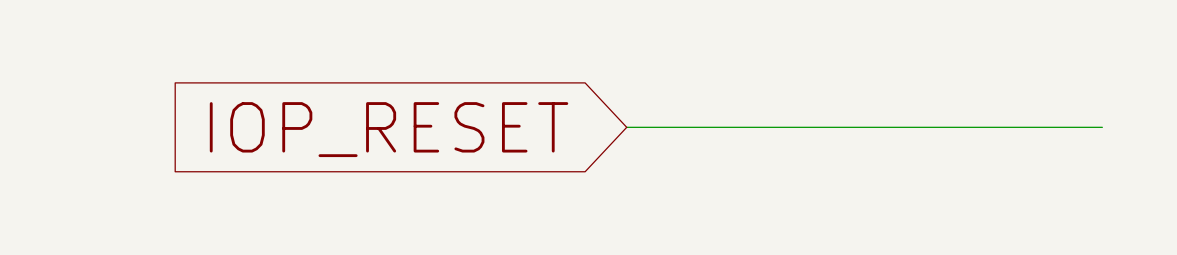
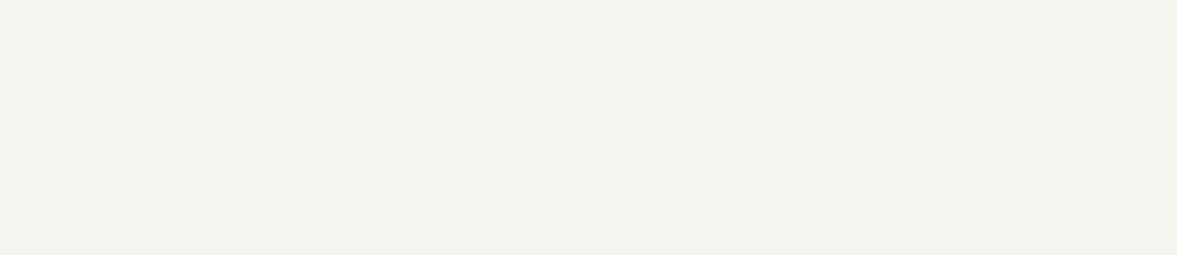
wire: (626, 127) (1102, 127) -> none
global label: IOP_RESET (389, 129) -> none

